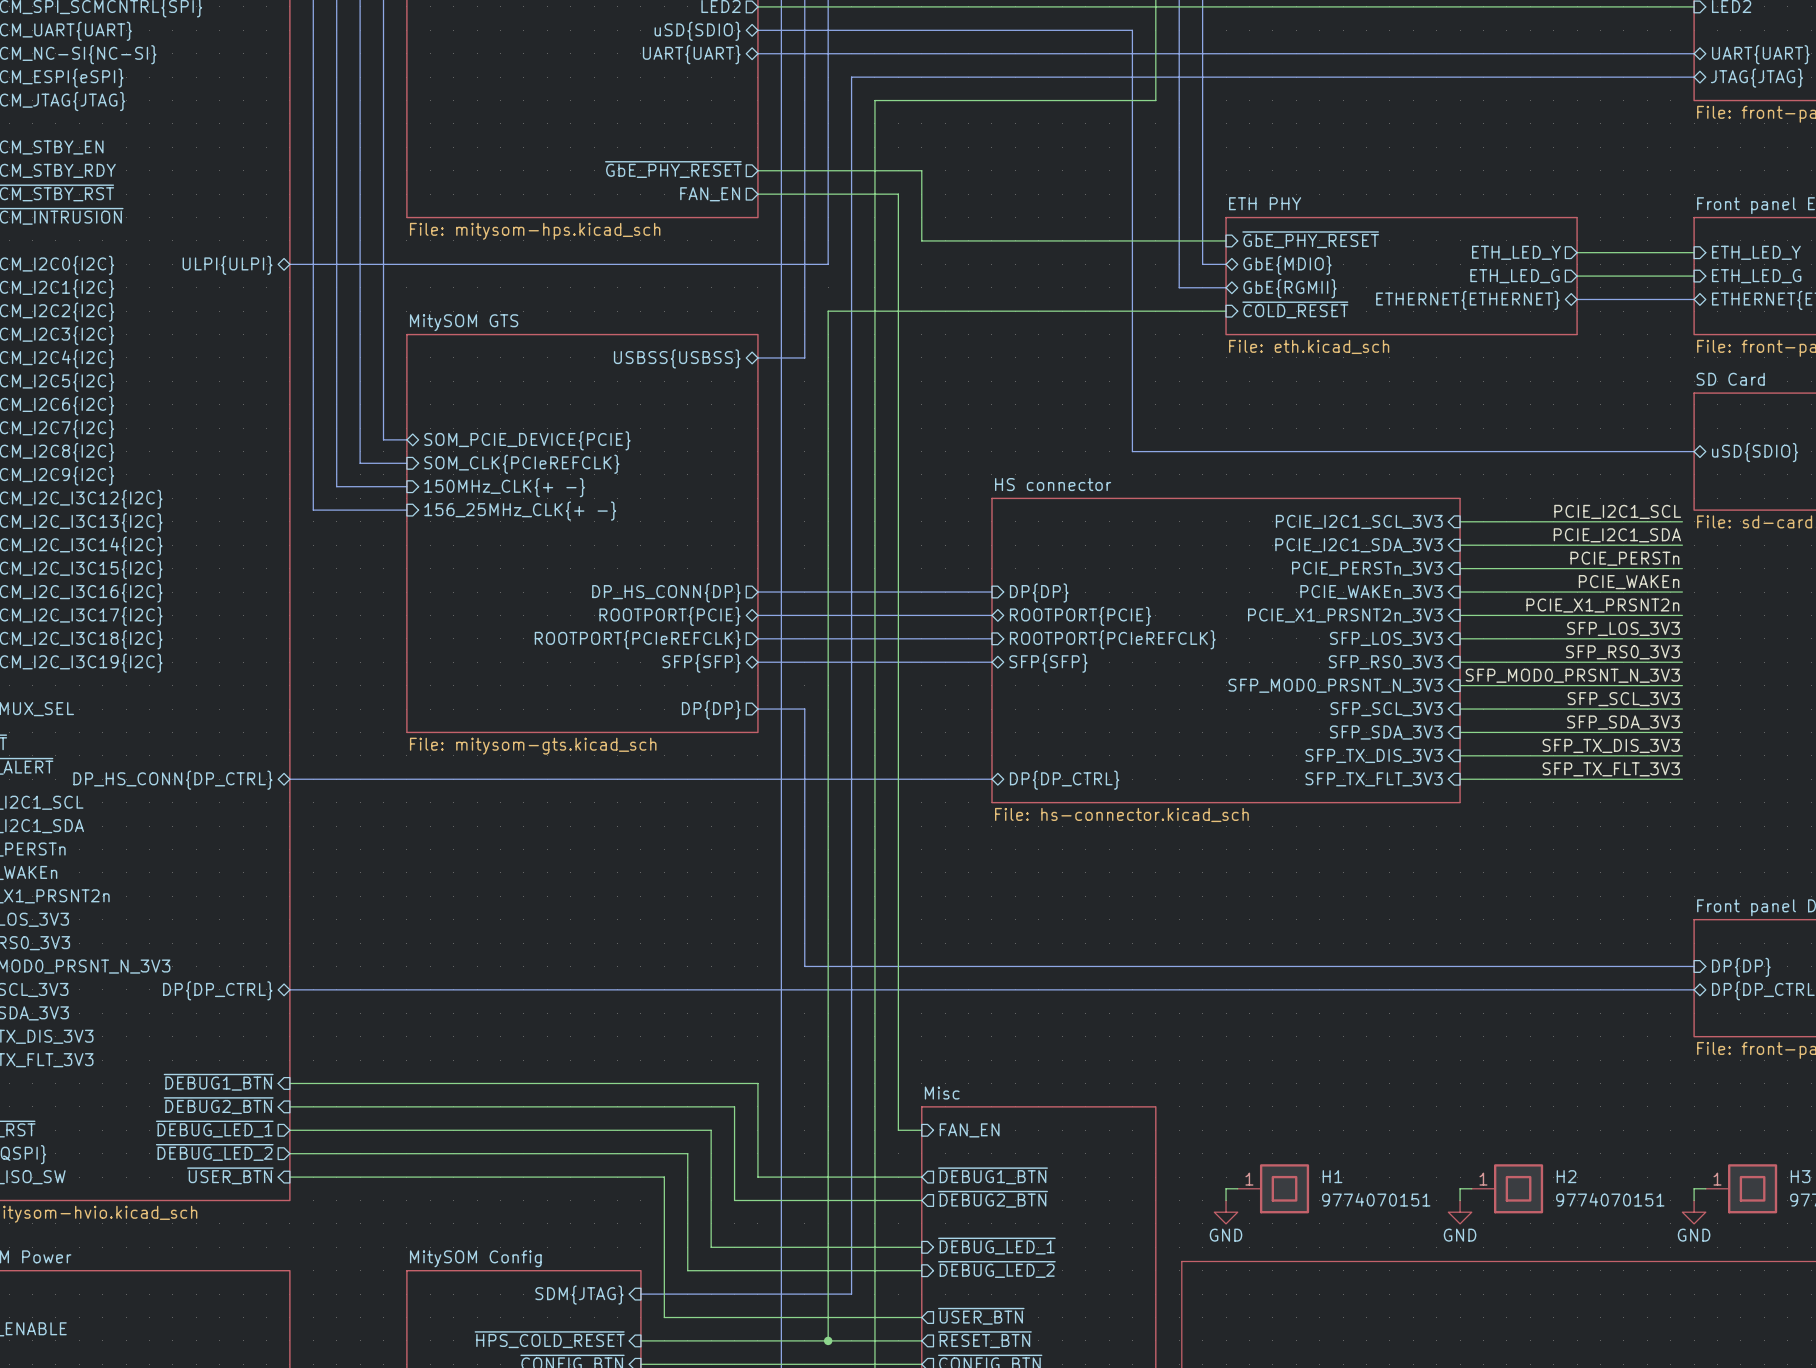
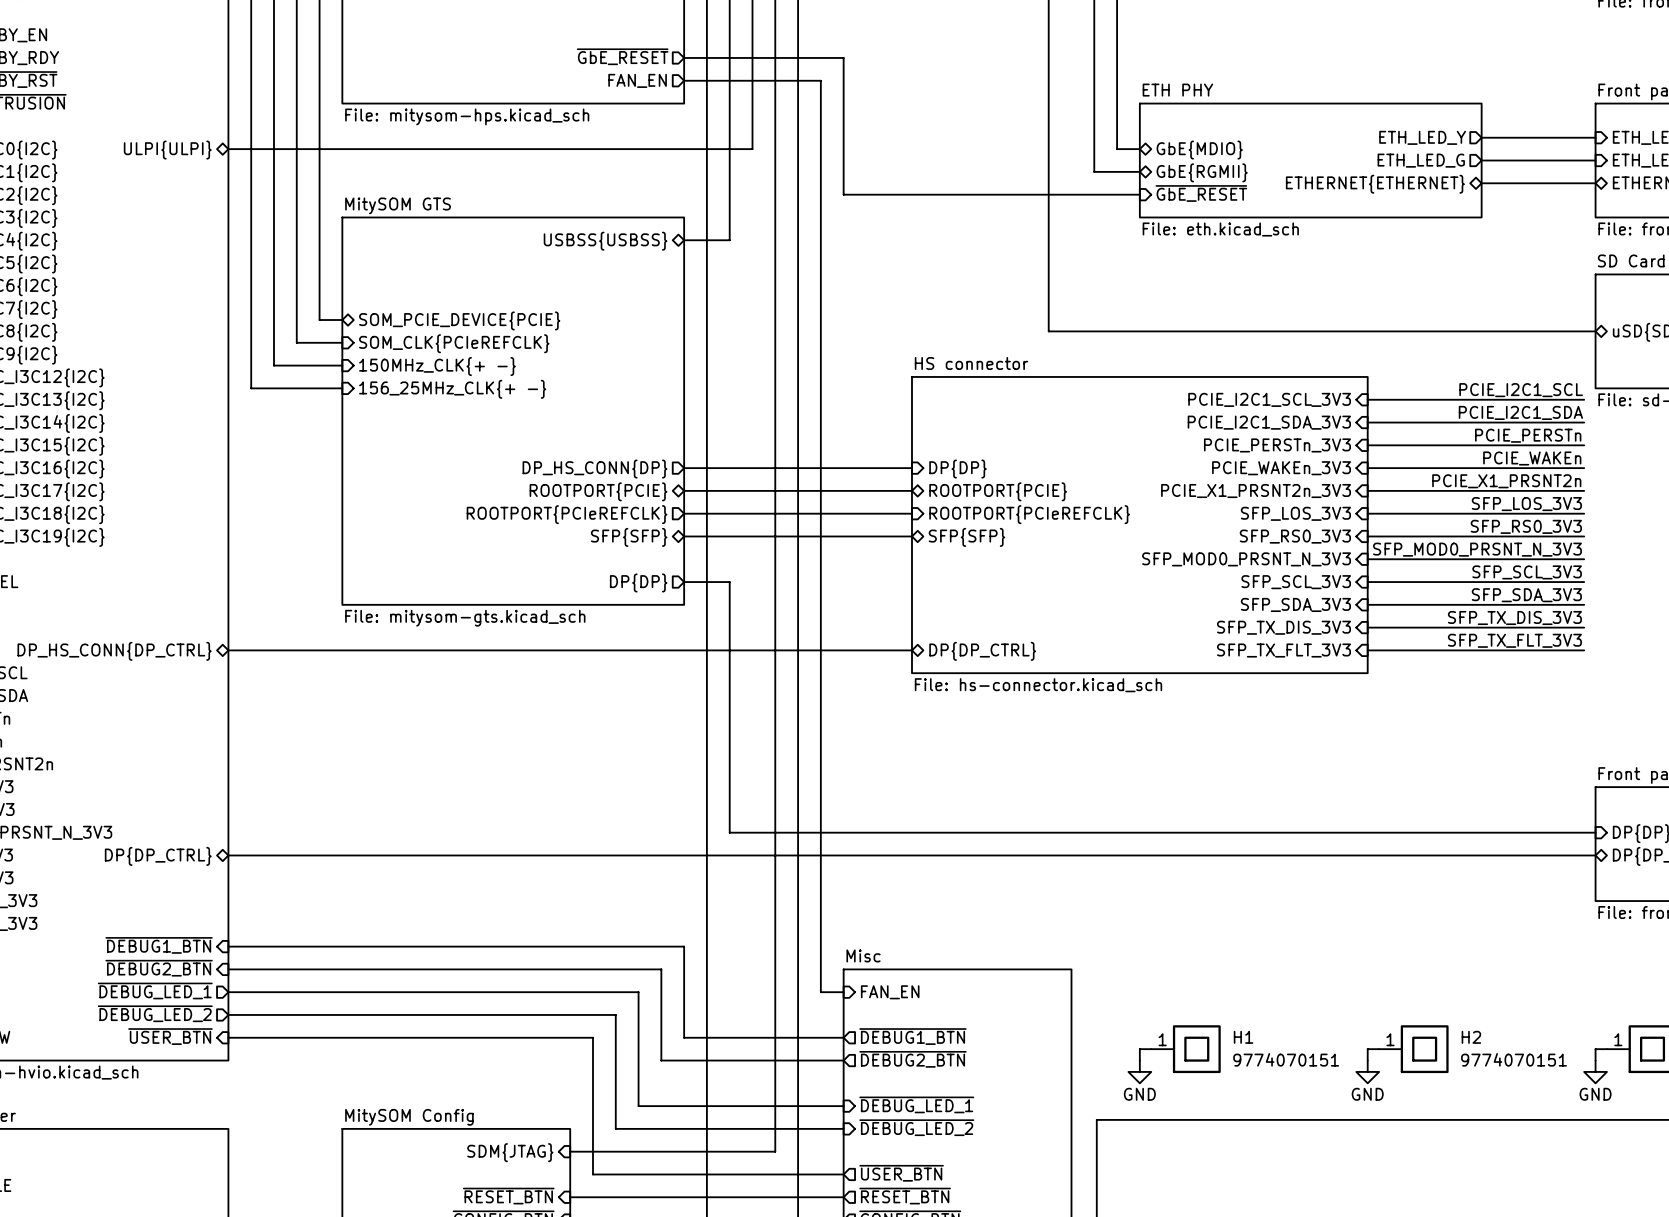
sheet pin: ~{GbE_PHY_RESET} (673, 169) -> ~{GbE_RESET} (622, 56)
sheet pin: ~{GbE_PHY_RESET} (1310, 239) -> none
wire: (921, 240) (1226, 240) -> (843, 126) (843, 194)
sheet pin: ~{COLD_RESET} (1295, 309) -> ~{GbE_RESET} (1201, 193)
wire: (921, 311) (828, 311) (828, 1340) -> none
sheet pin: ~{HPS_COLD_RESET} (549, 1339) -> ~{RESET_BTN} (508, 1196)
junction: (828, 1340) -> none

